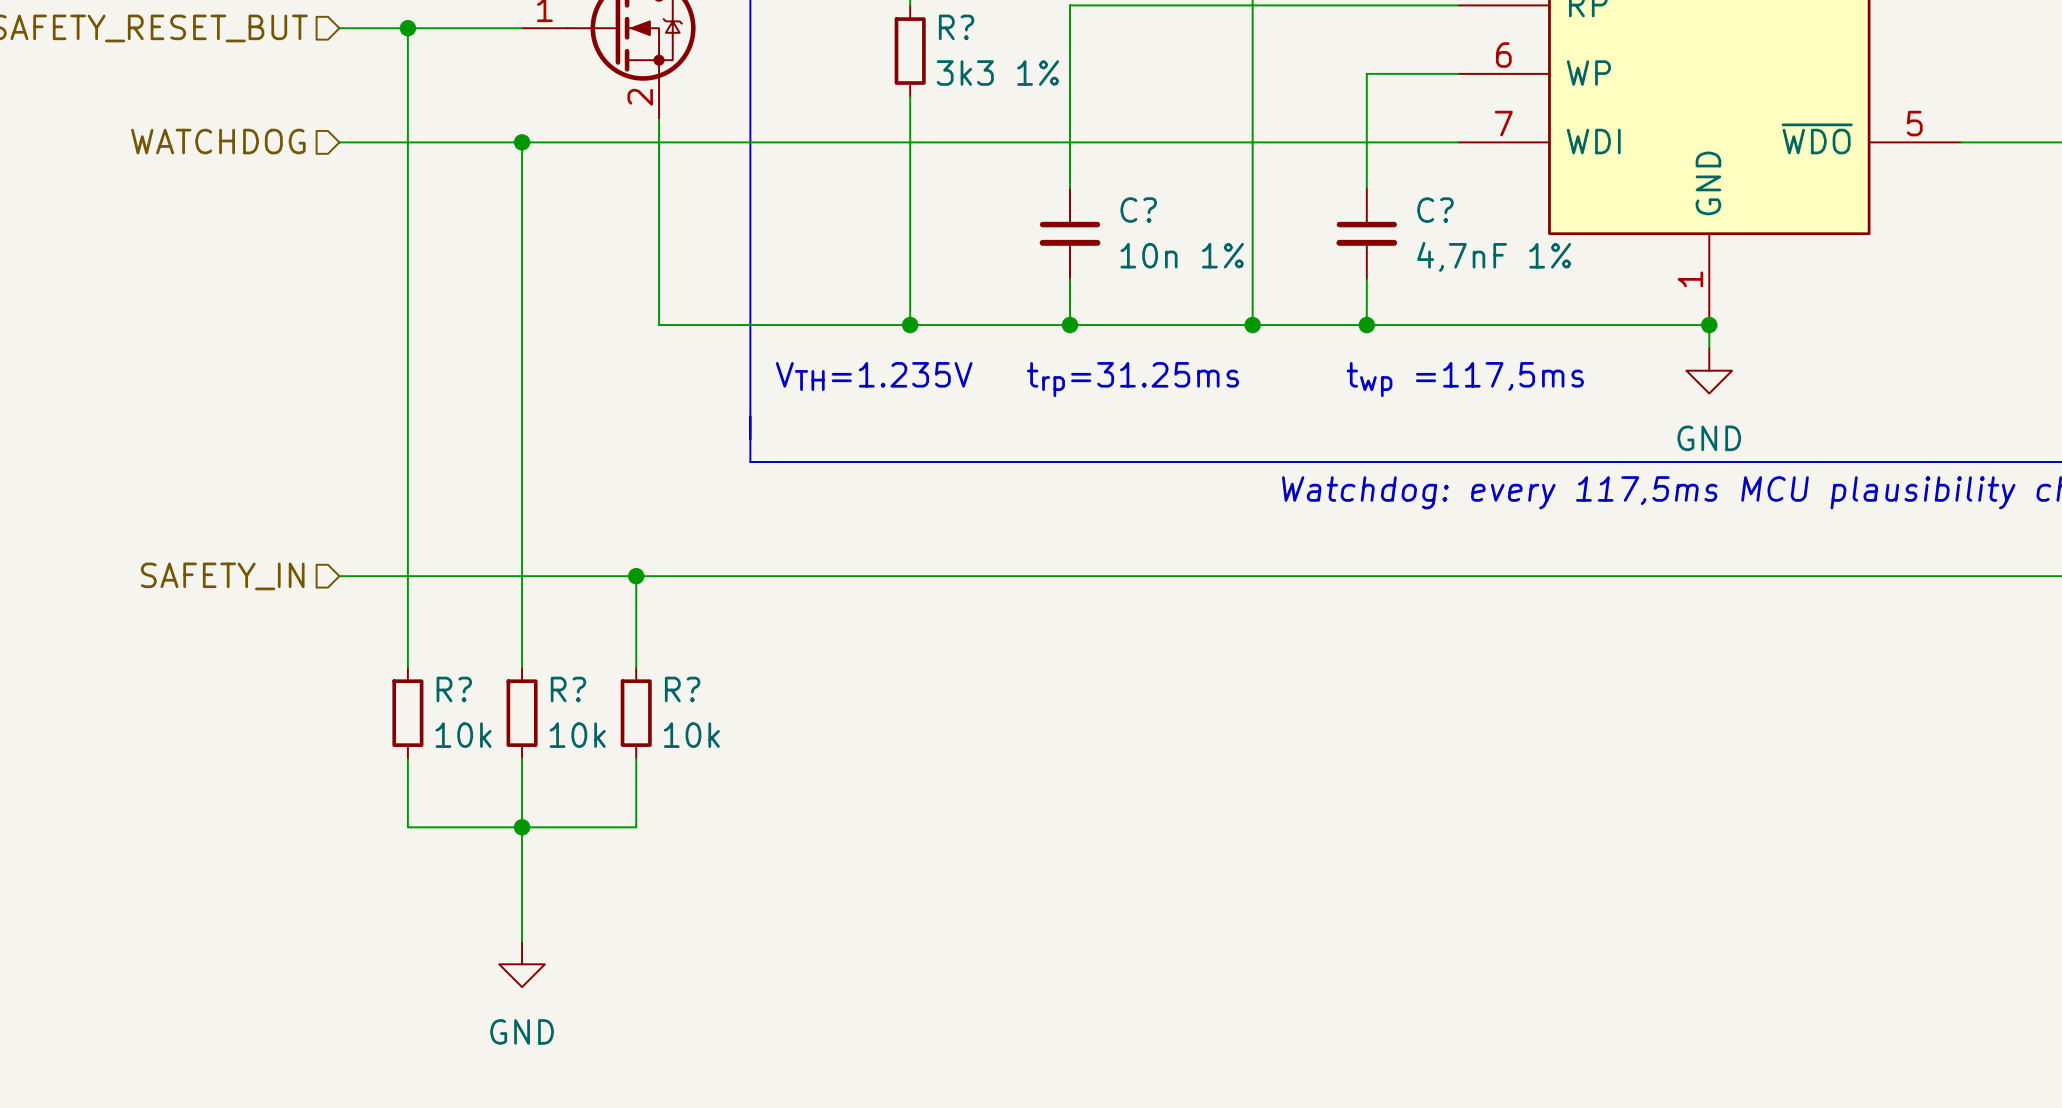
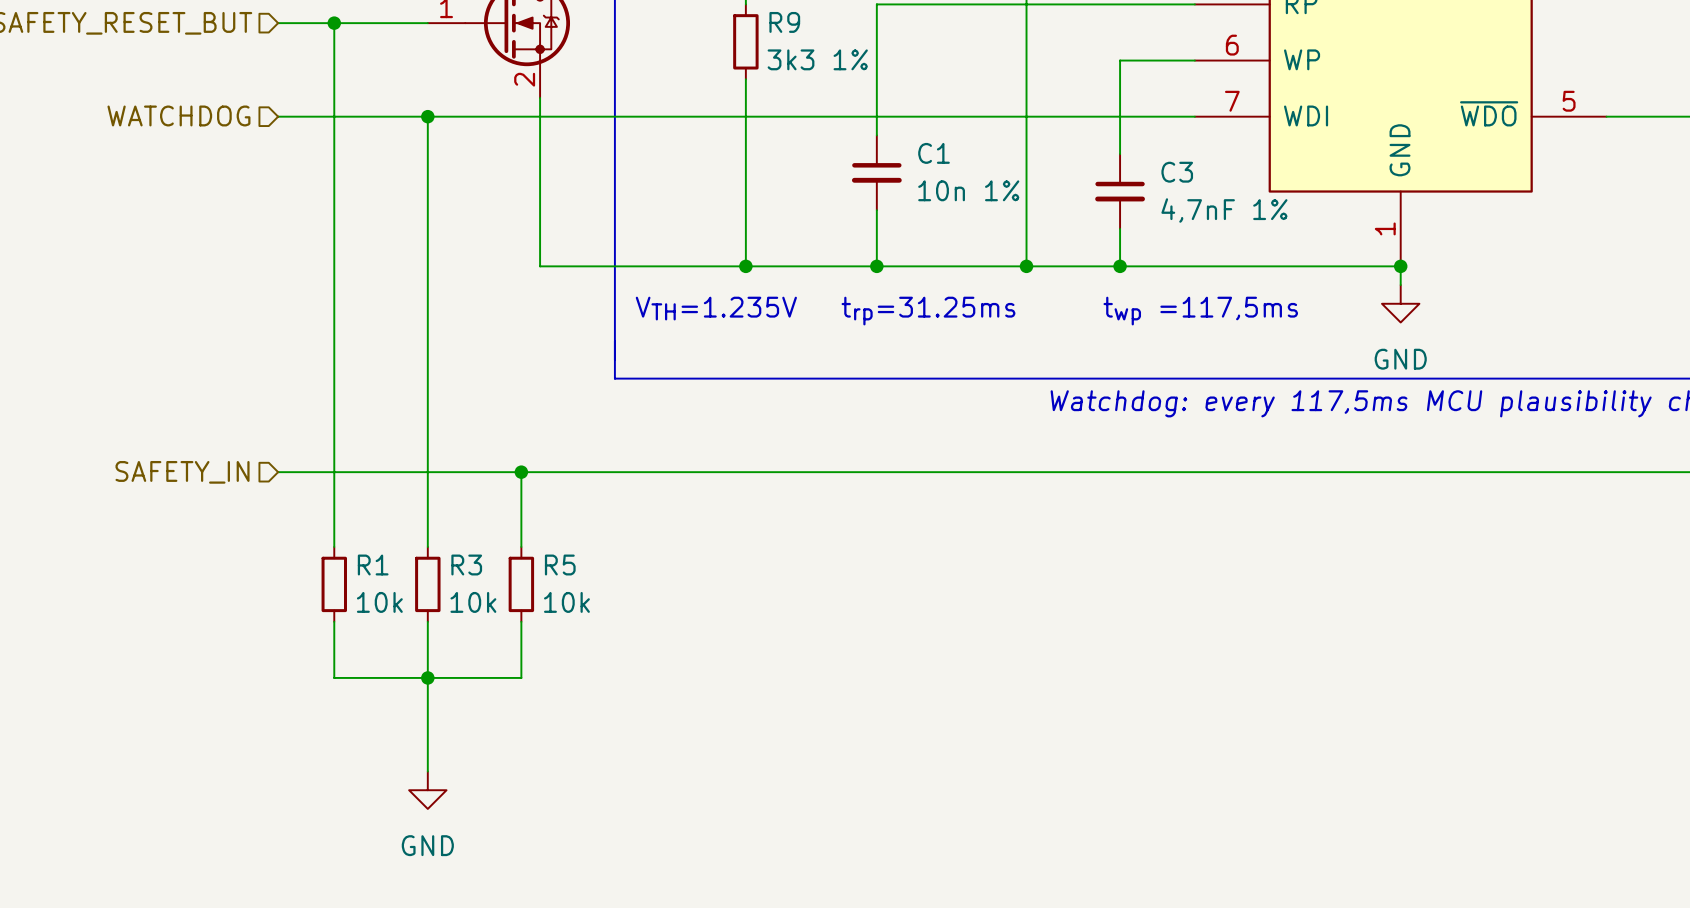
R? name: R? (956, 27) -> R9 (784, 22)
C1: none -> 10n 1% (876, 172)
C? name: C? (1435, 210) -> C3 (1177, 172)
C?: 10n 1% (1070, 233) -> none
R? name: R? (454, 689) -> R1 (373, 565)
R? name: R? (568, 689) -> R3 (466, 565)
R? name: R? (682, 689) -> R5 (560, 565)

